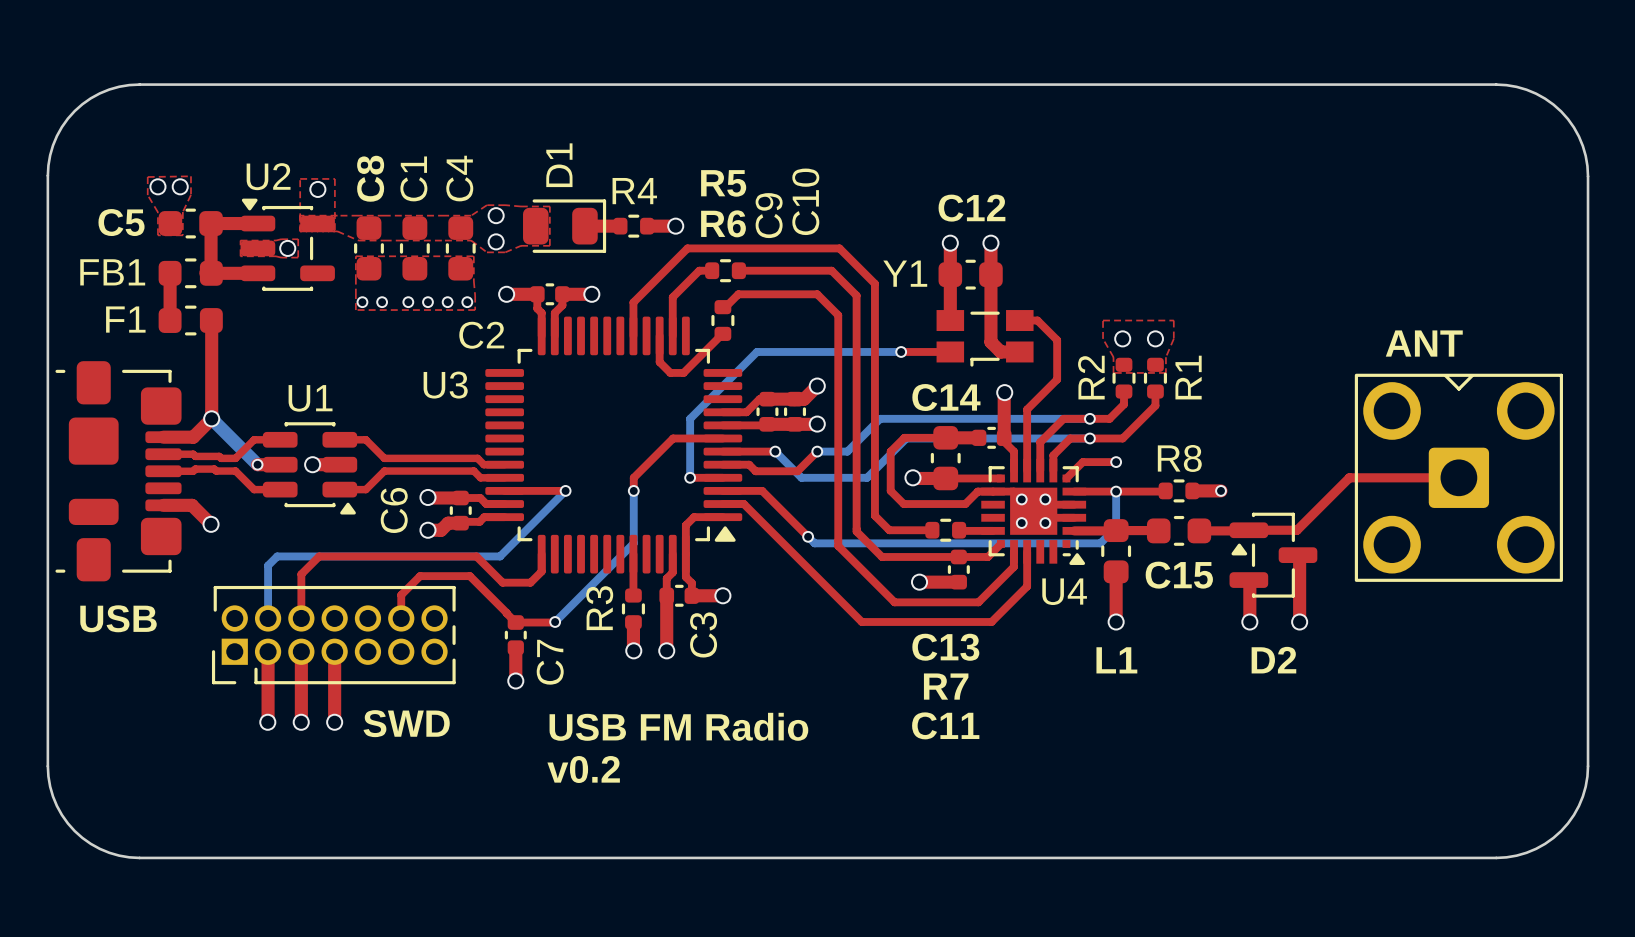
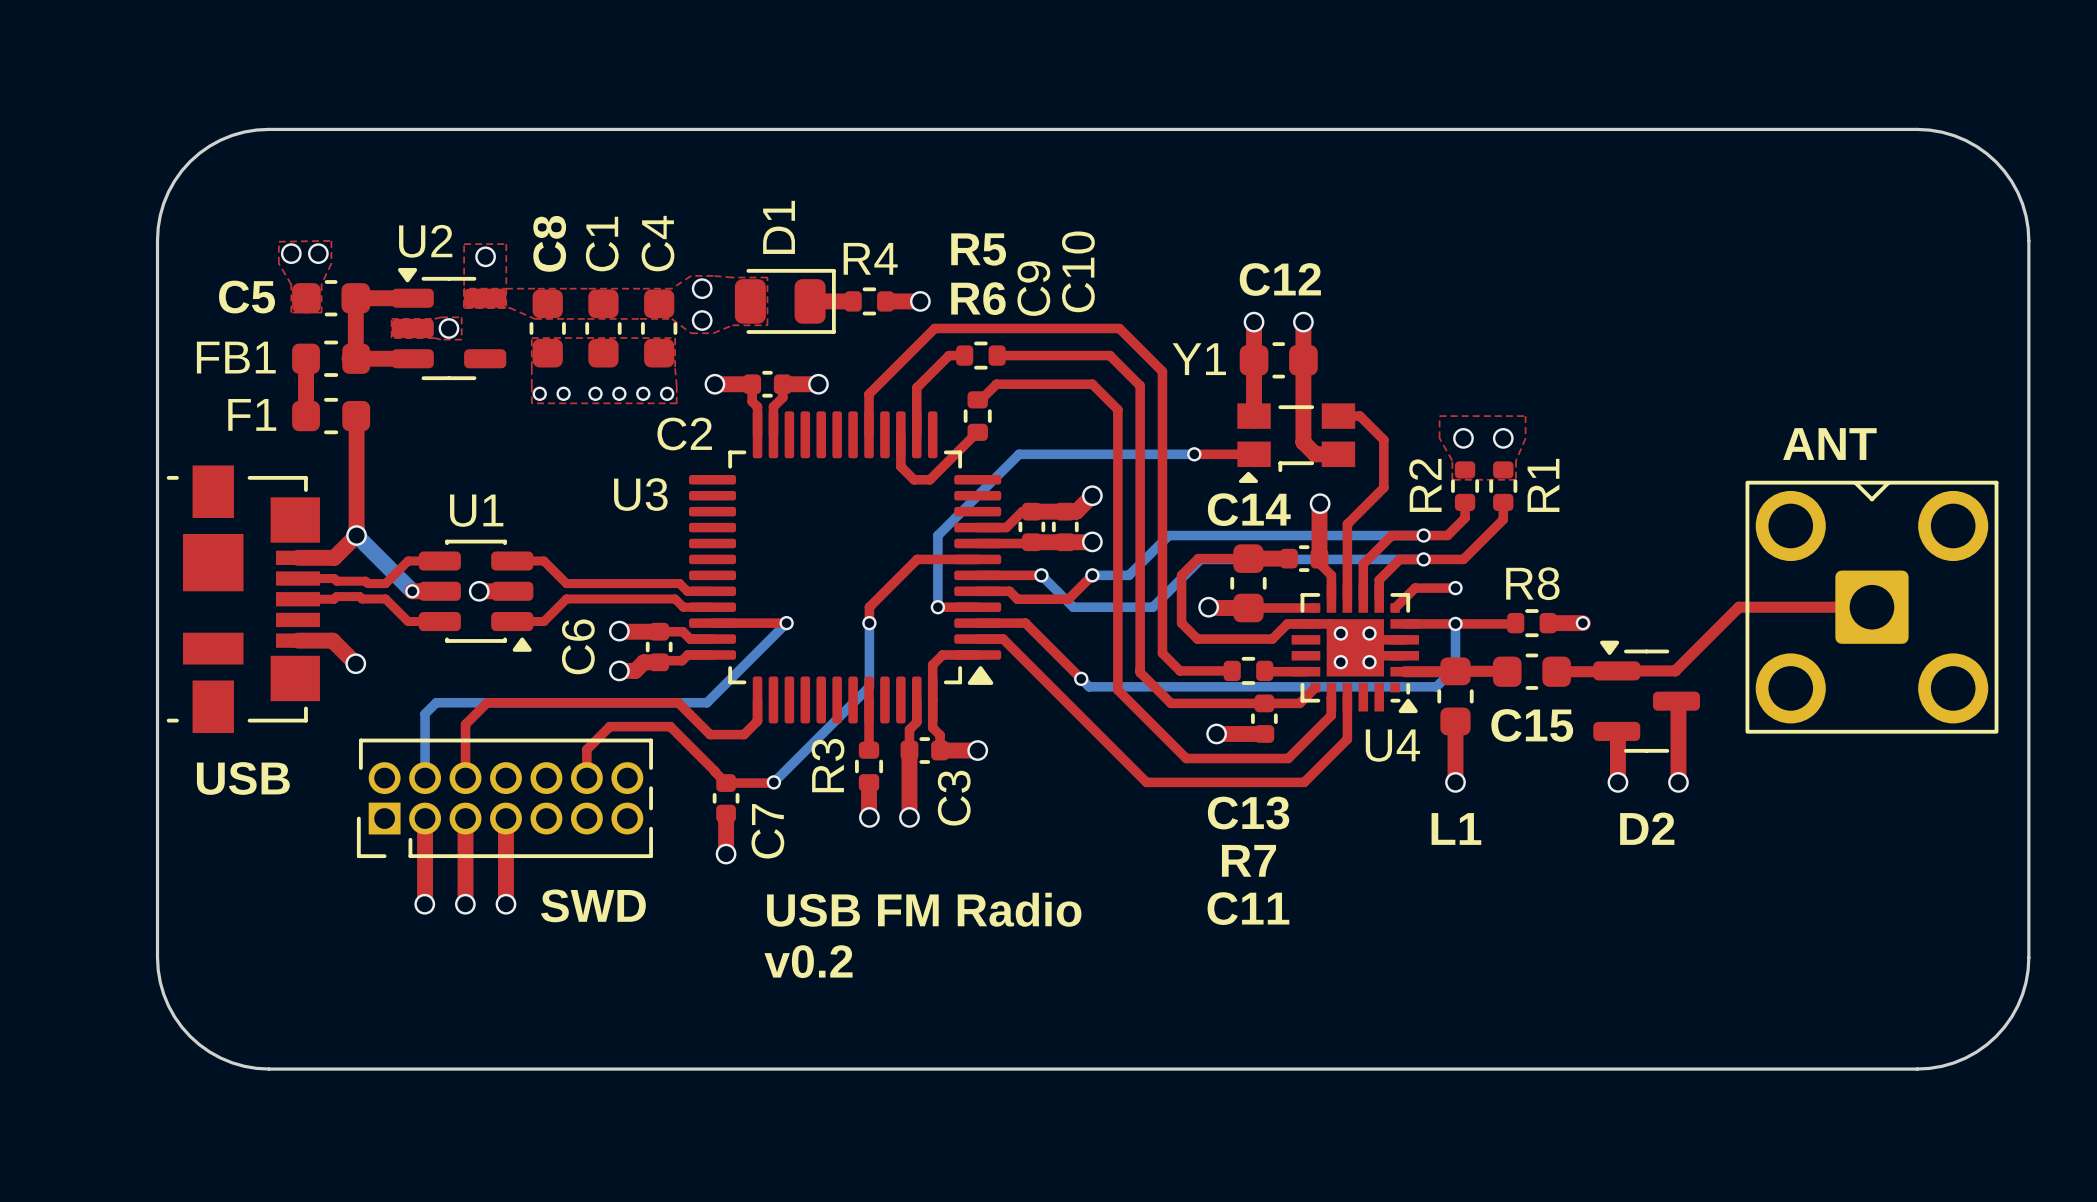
U2 footprint: [240, 198, 335, 291] -> [391, 267, 507, 381]
Y1 footprint: [936, 310, 1034, 367] -> [1237, 403, 1356, 483]
part footprint: [55, 361, 182, 582] -> [166, 465, 320, 734]
D2 footprint: [1229, 512, 1318, 598] -> [1593, 640, 1700, 753]

